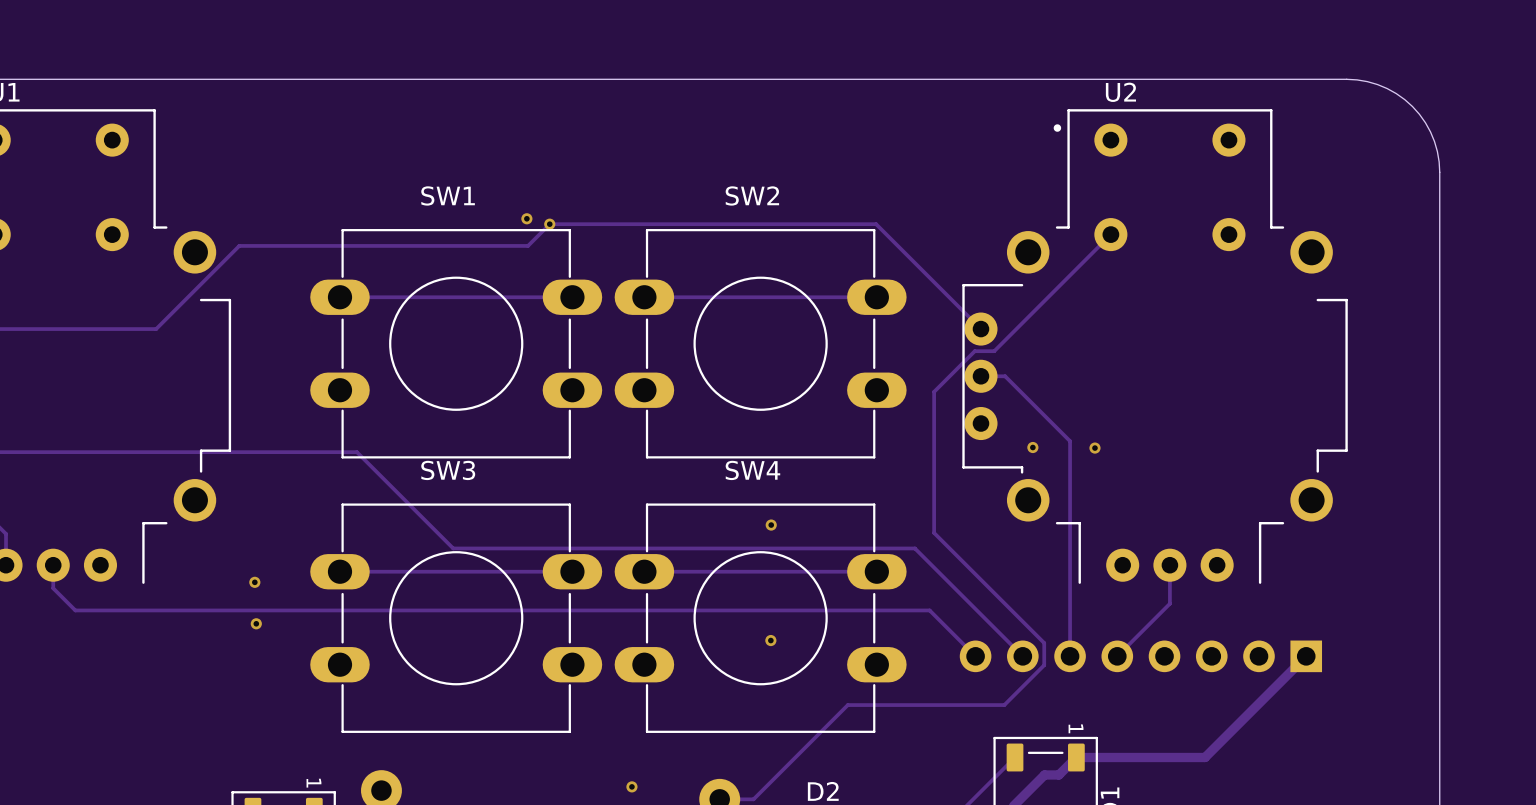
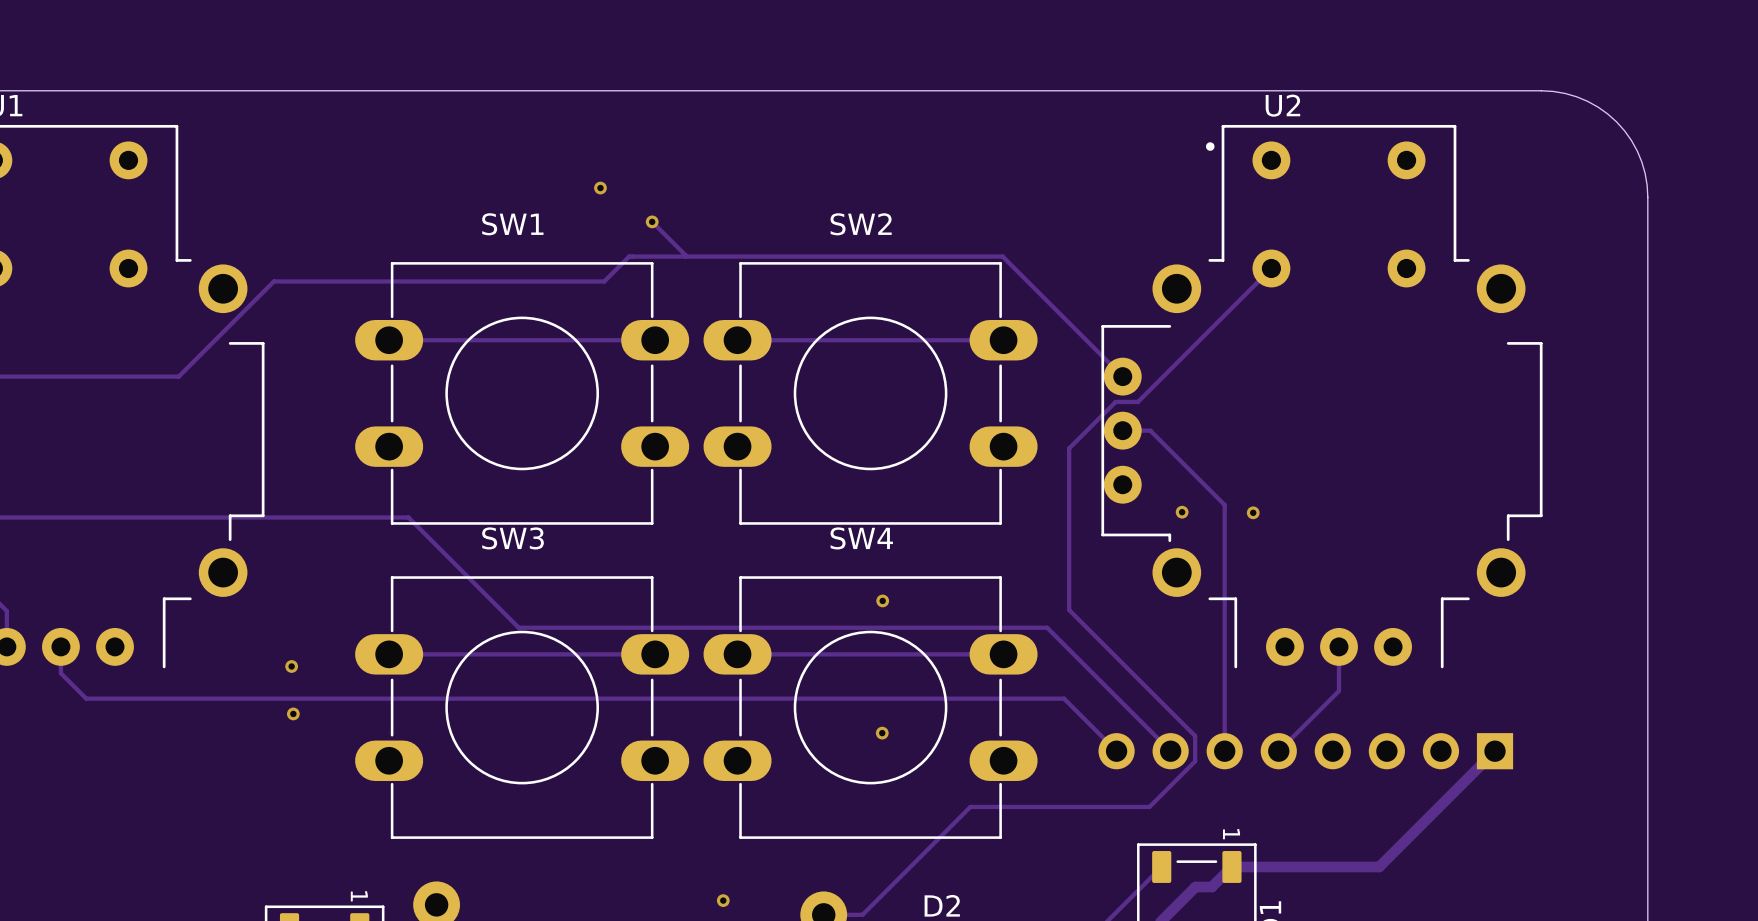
via: none -> (600, 188)
track: none -> (652, 221) (685, 256)
via: none -> (652, 221)
via: (526, 218) -> none
via: (549, 224) -> none

